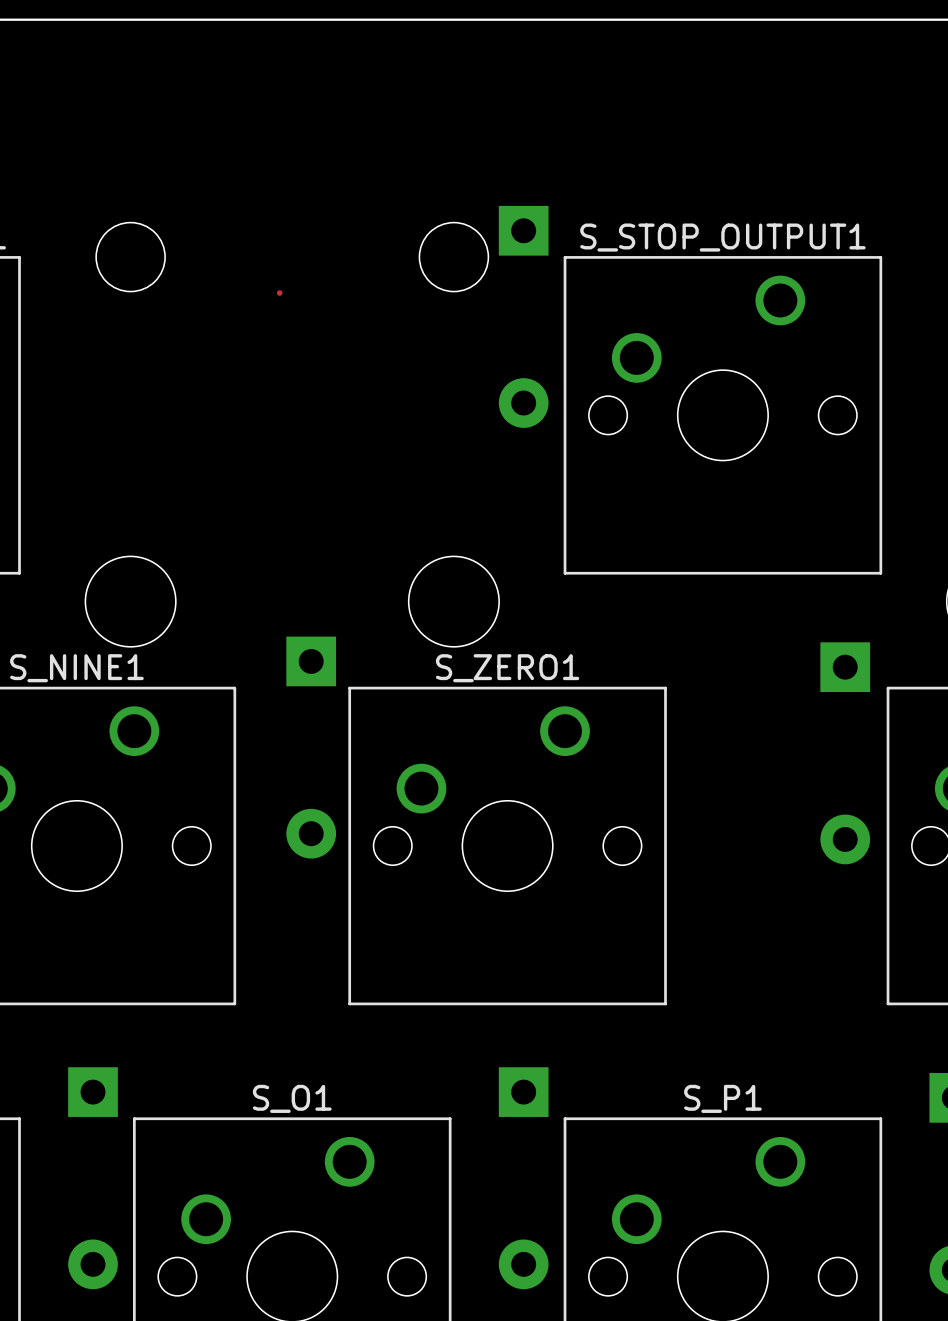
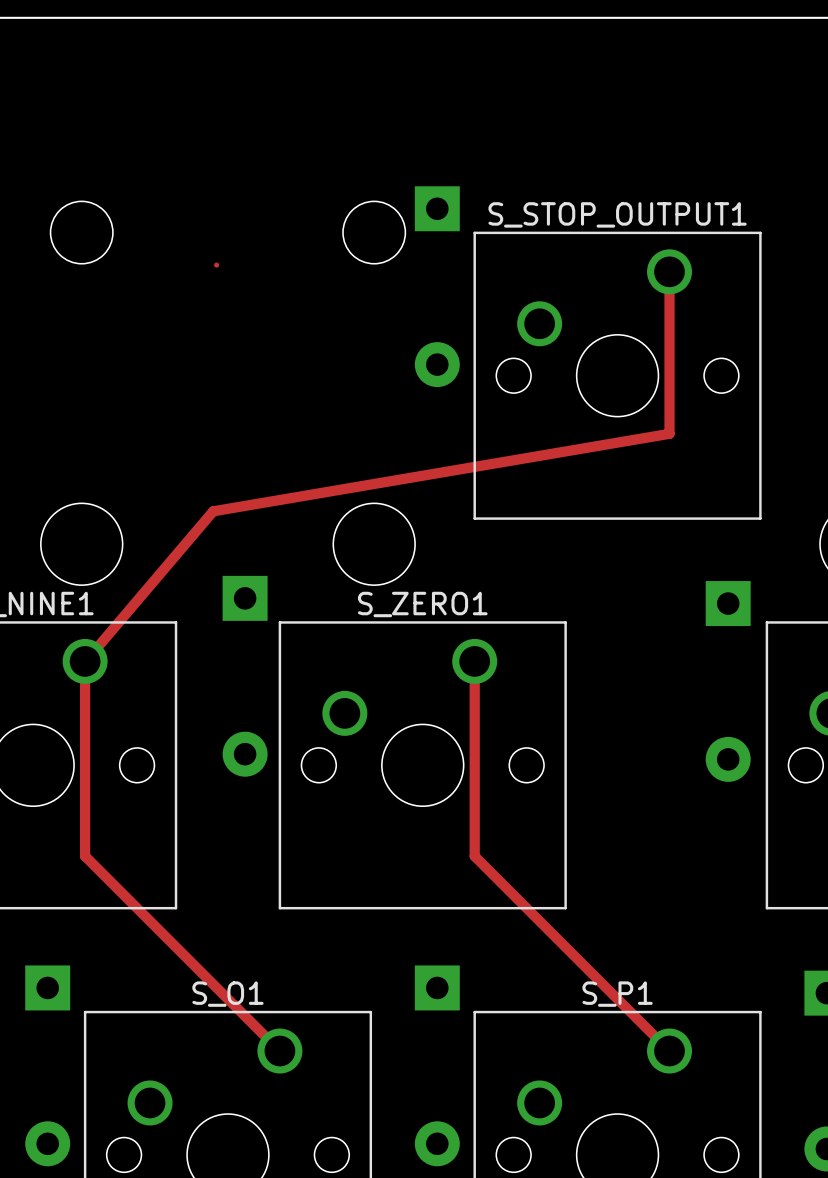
track: none -> (669, 271) (669, 433) (213, 511) (85, 661) (85, 856) (279, 1051)
track: none -> (474, 661) (474, 856) (669, 1051)

